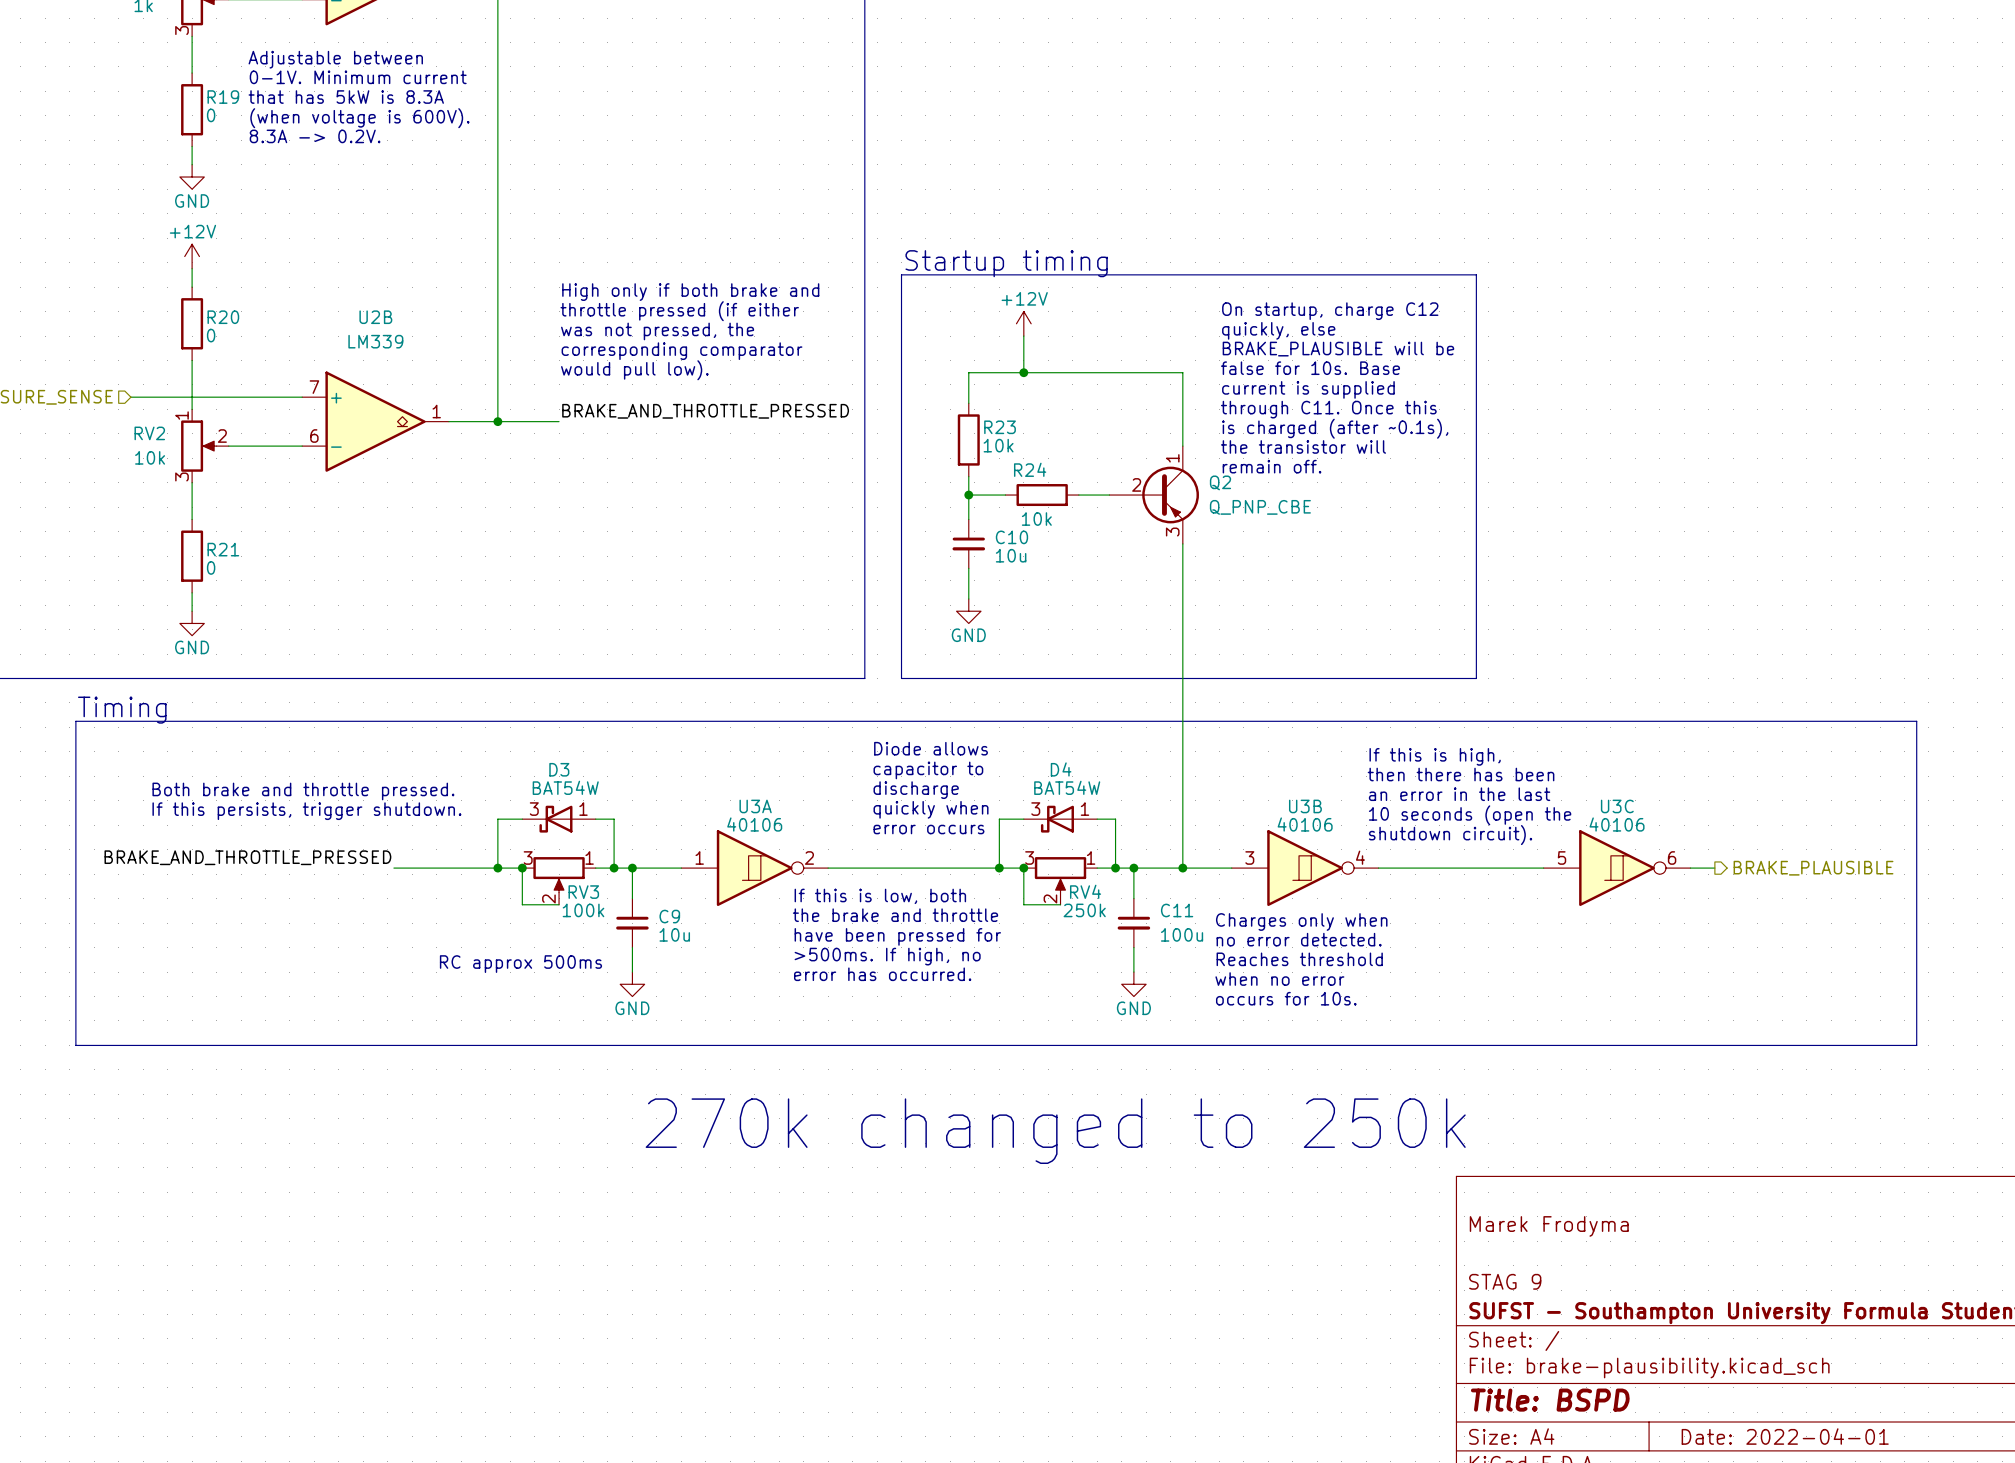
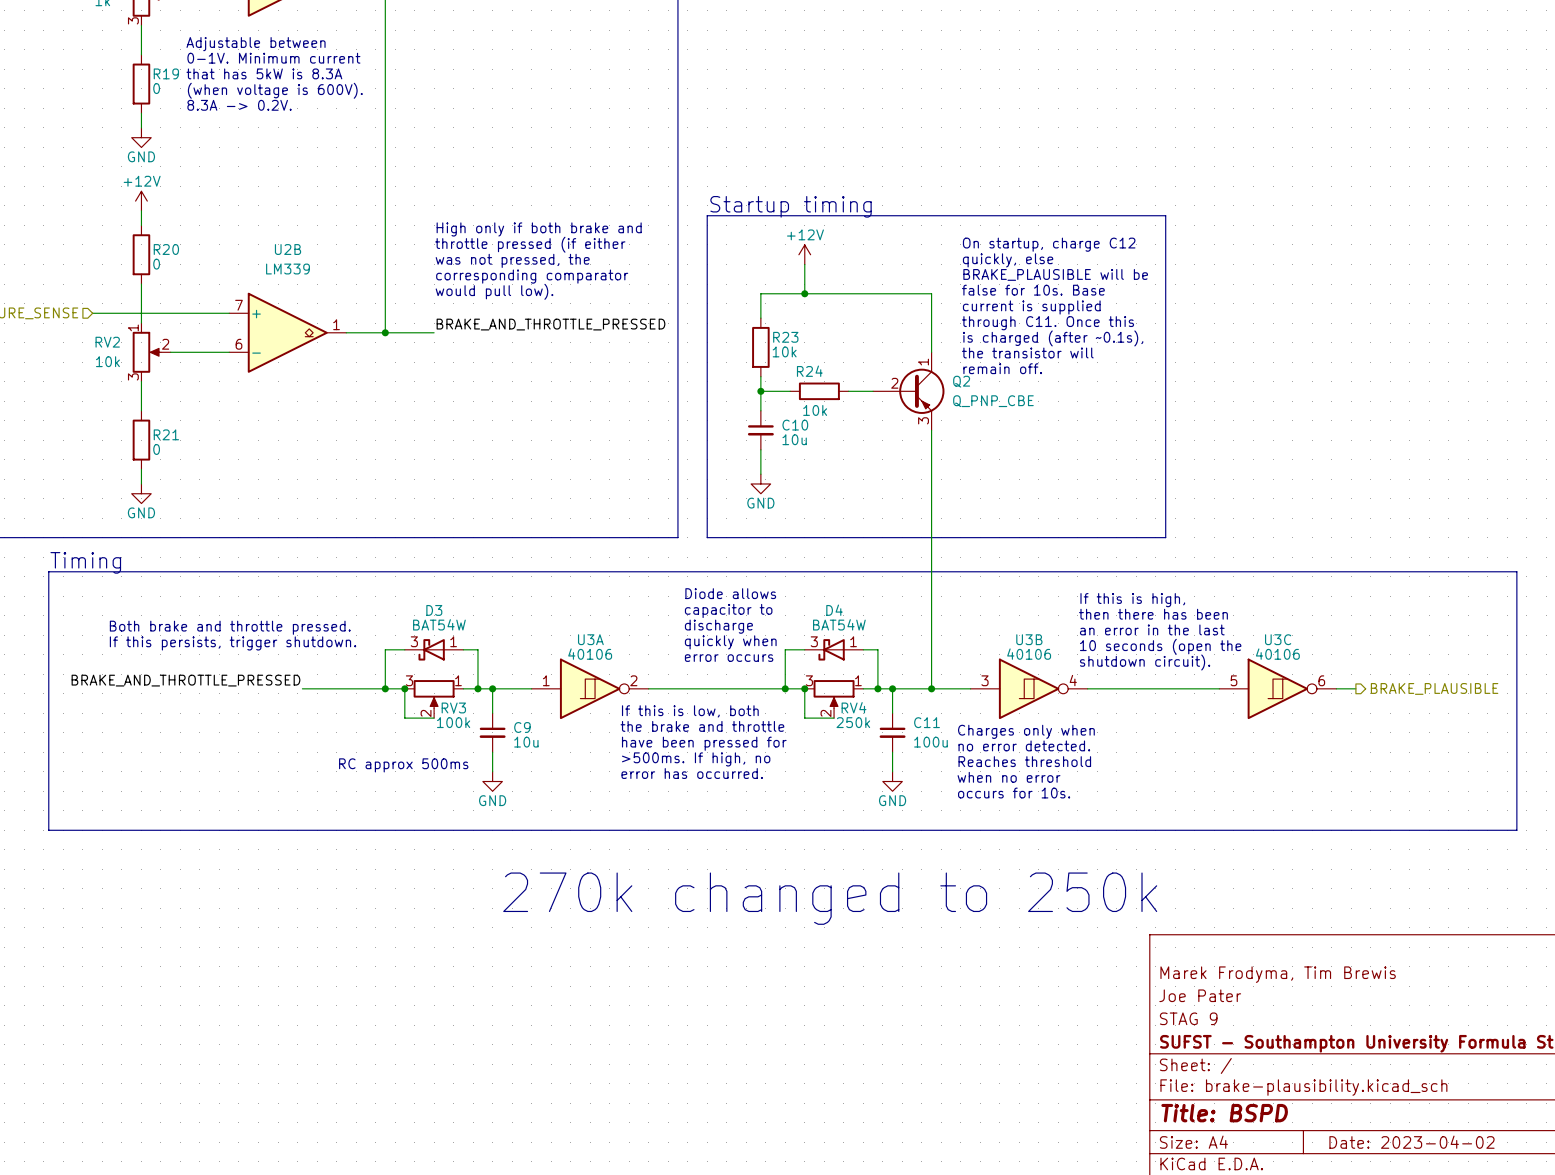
title block: Marek Frodyma (1549, 1226) -> Marek Frodyma, Tim Brewis (1278, 974)
title block: none -> Joe Pater (1200, 995)
title block: Date: 2022-04-01 (1785, 1436) -> Date: 2023-04-02 (1411, 1142)

